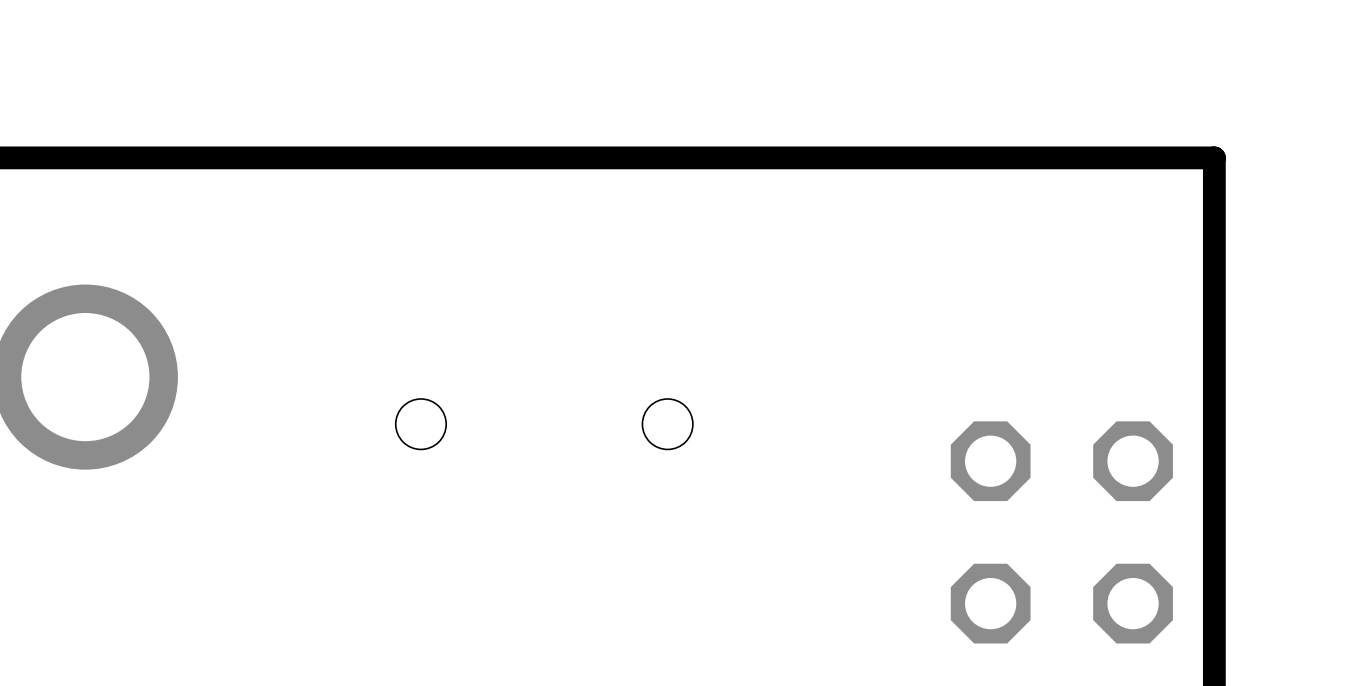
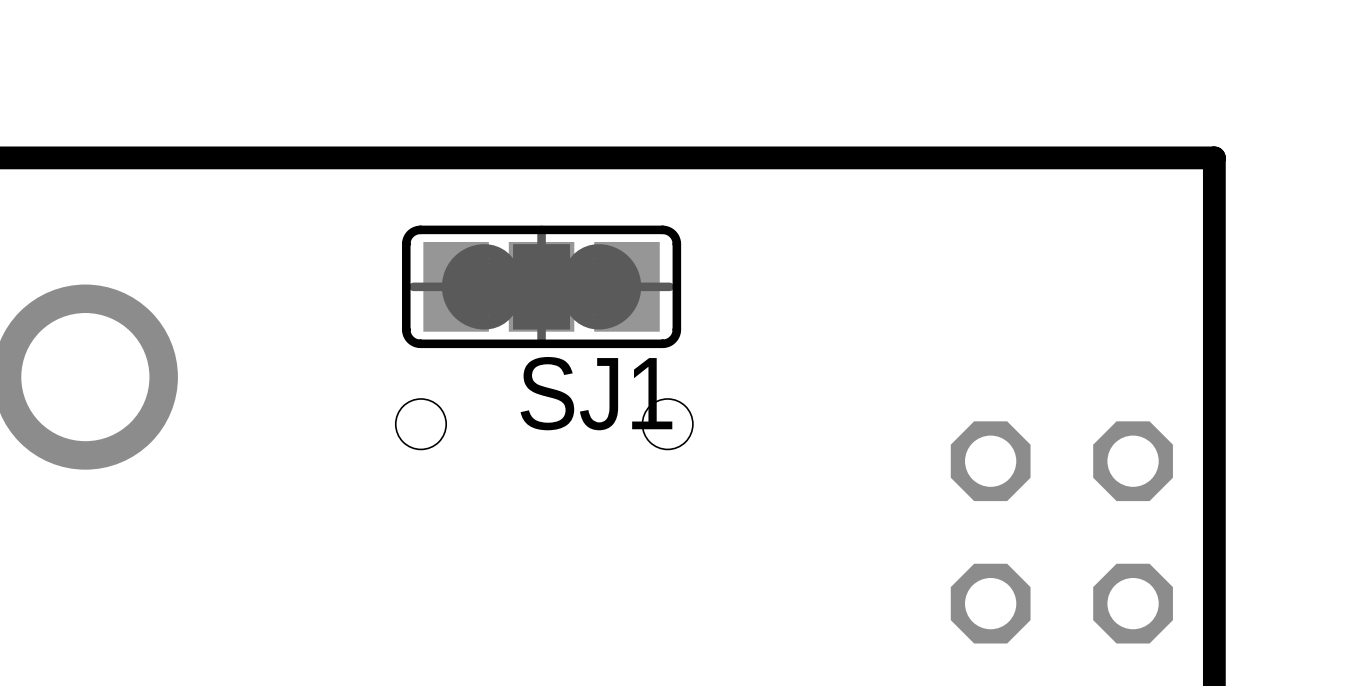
SJ1: none -> (541, 286)

